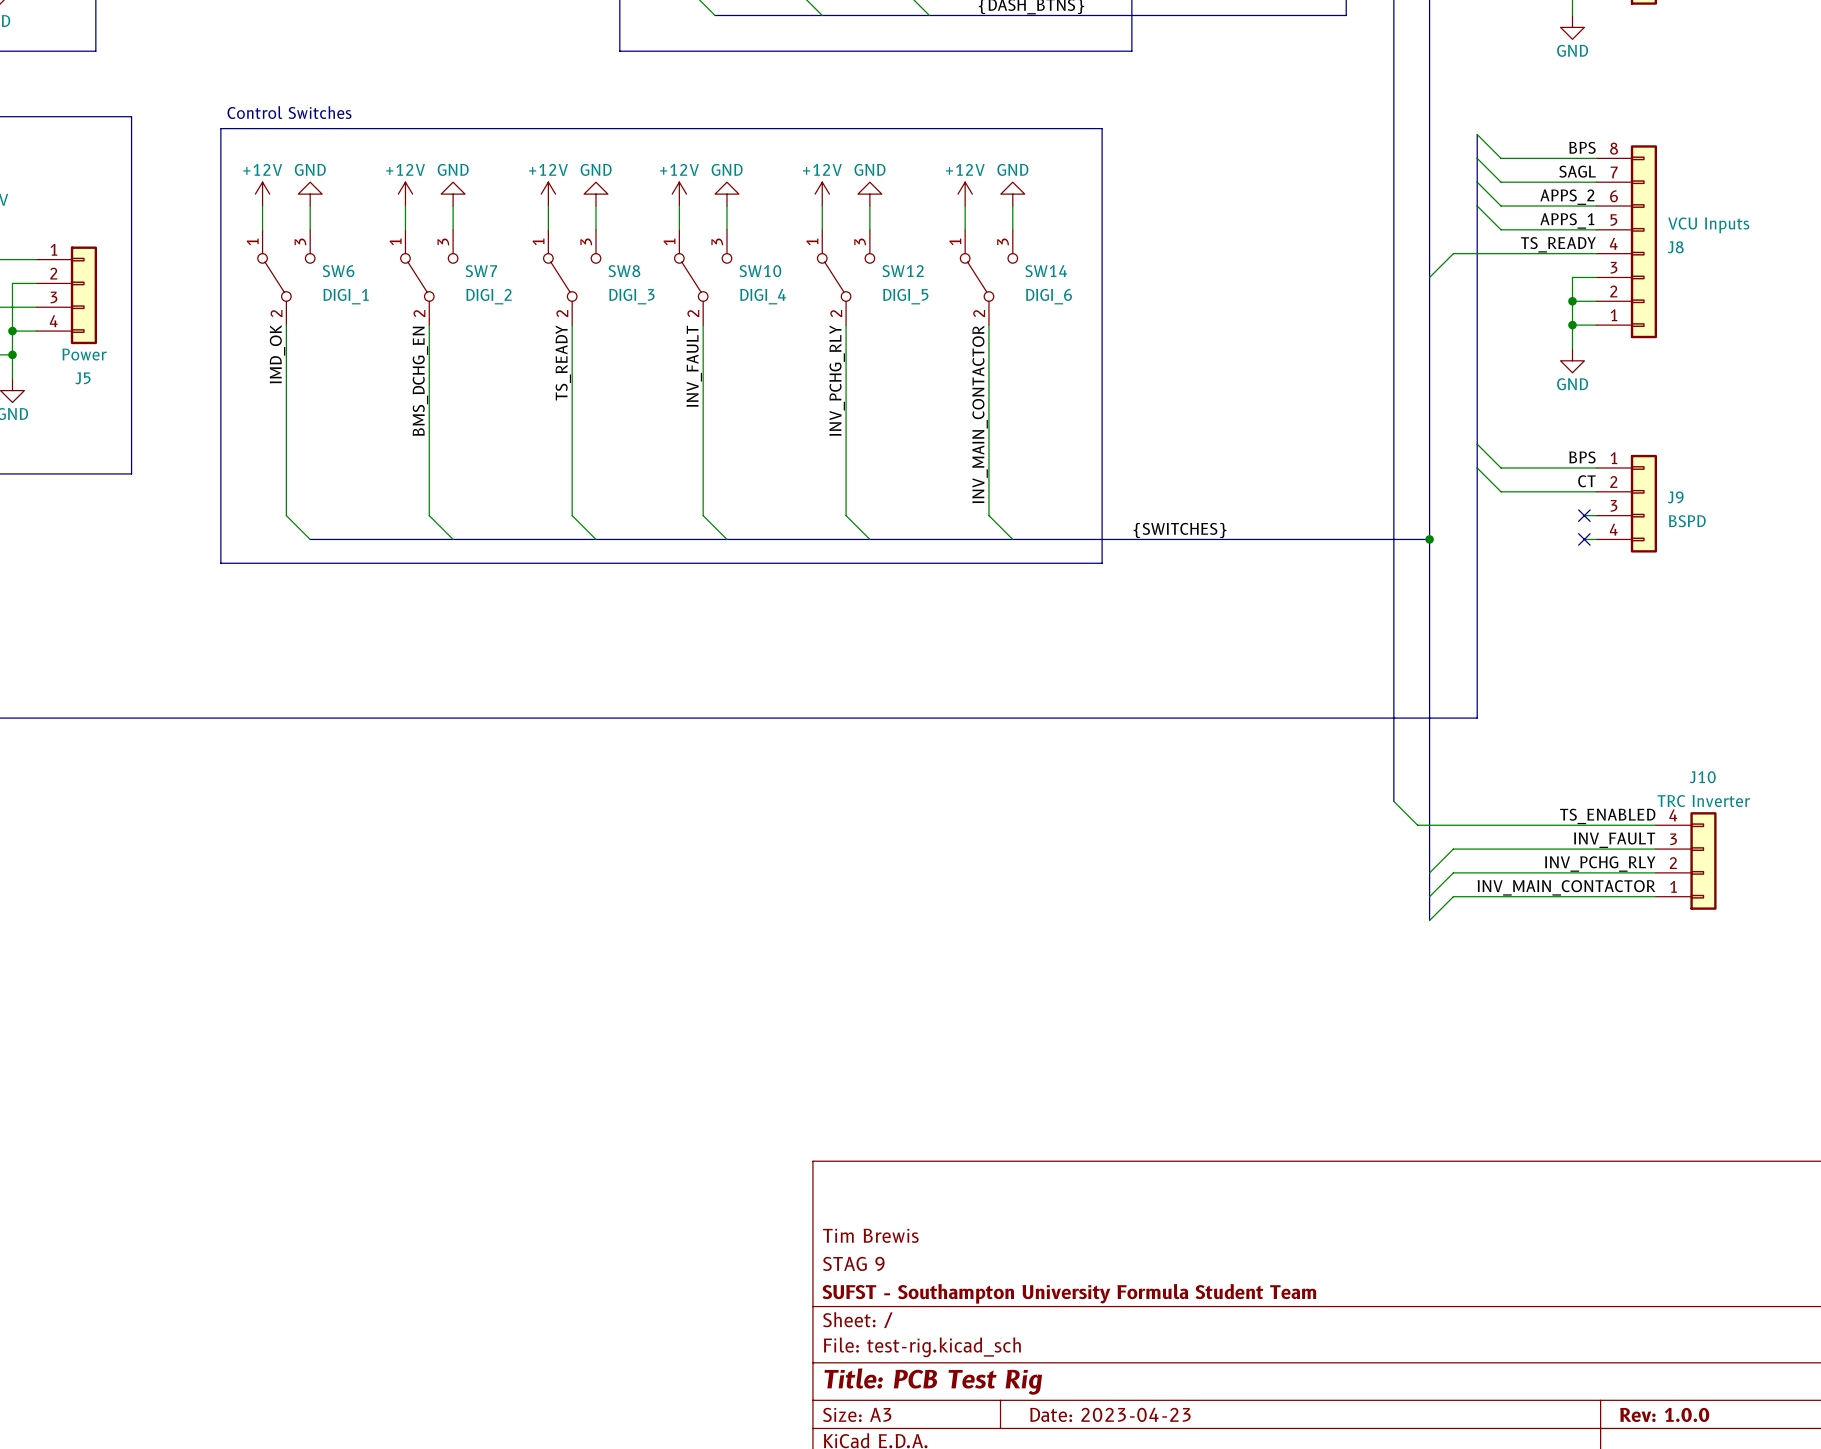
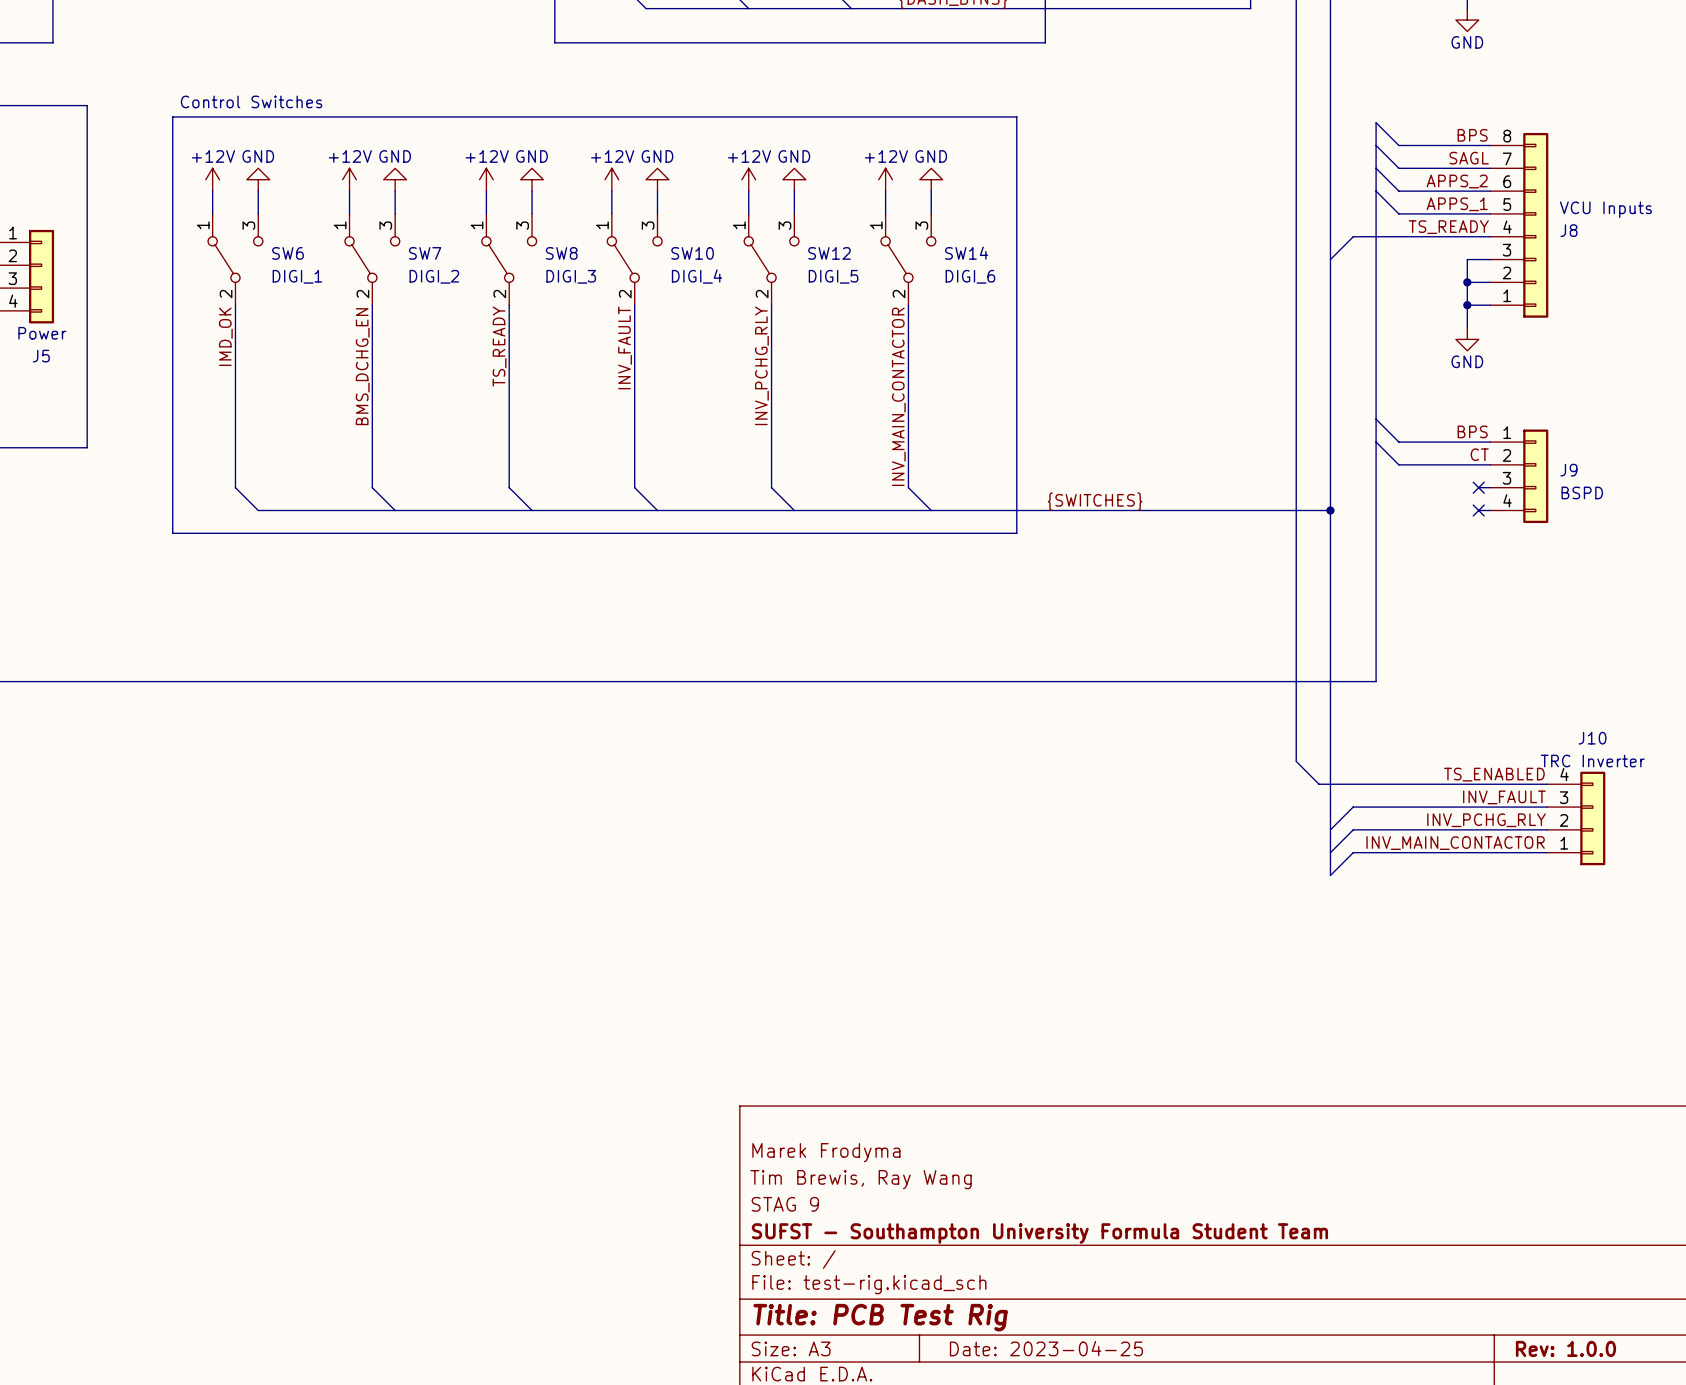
title block: none -> Marek Frodyma (826, 1152)
title block: Tim Brewis (870, 1235) -> Tim Brewis, Ray Wang (861, 1179)
title block: Date: 2023-04-23 (1110, 1414) -> Date: 2023-04-25 (1046, 1348)

